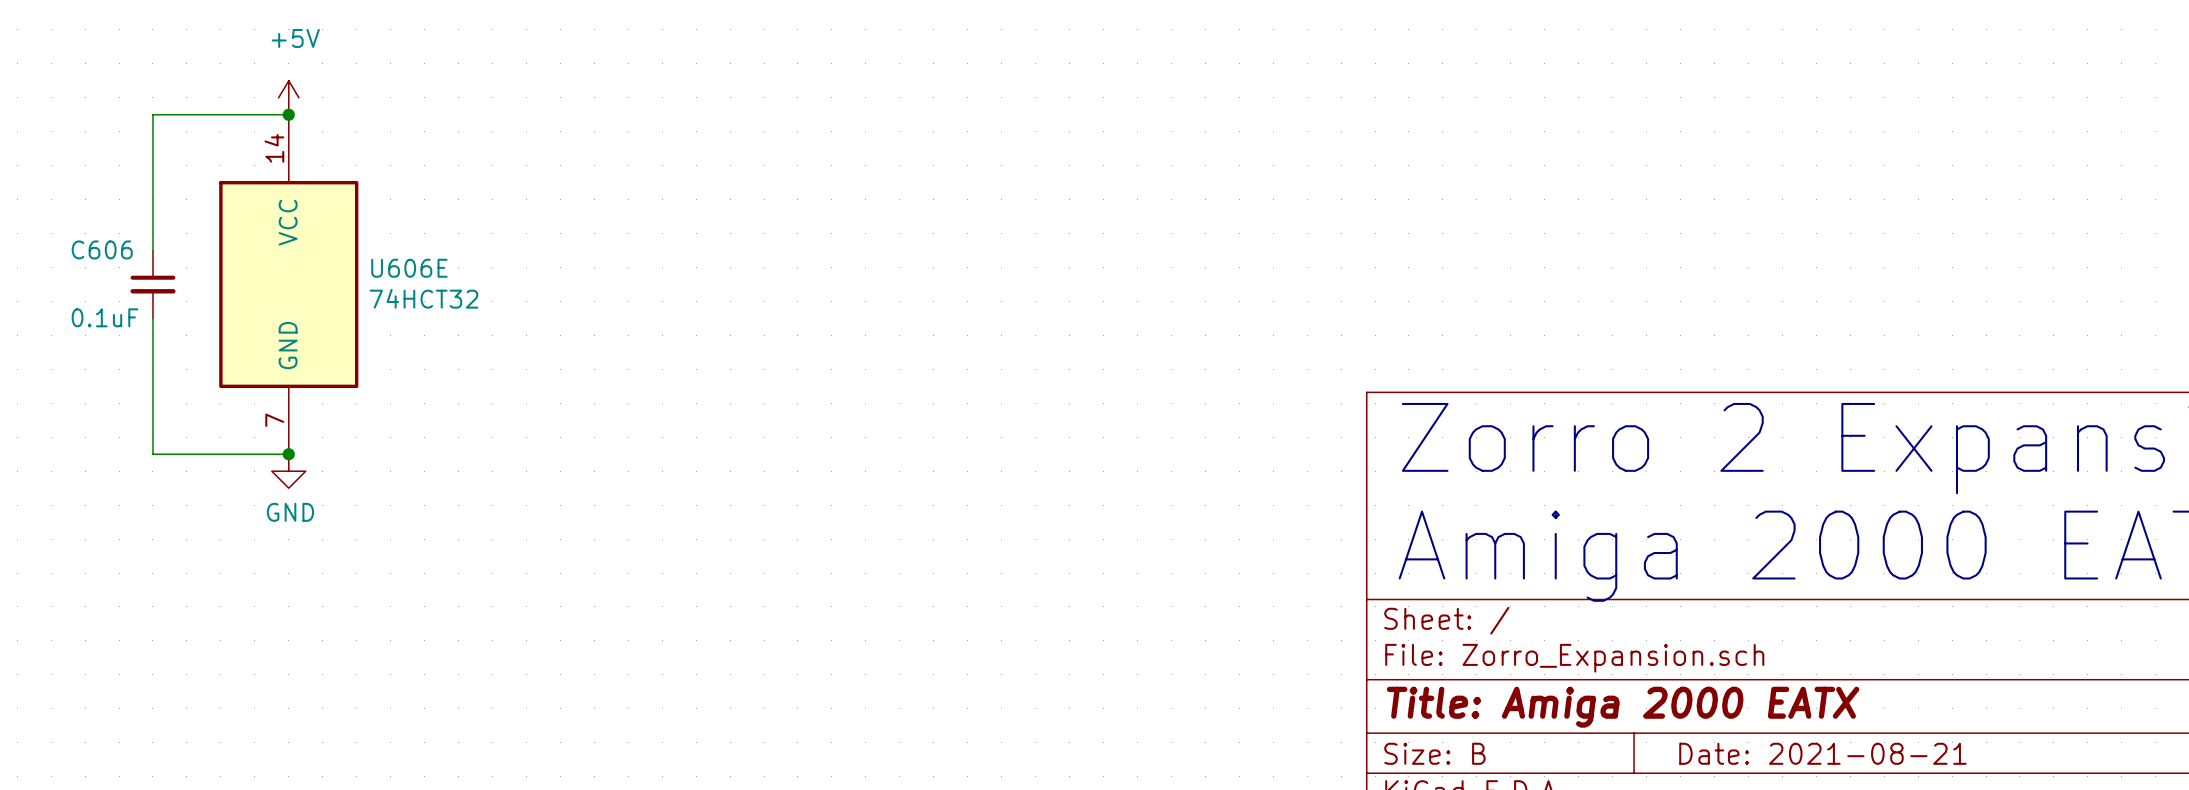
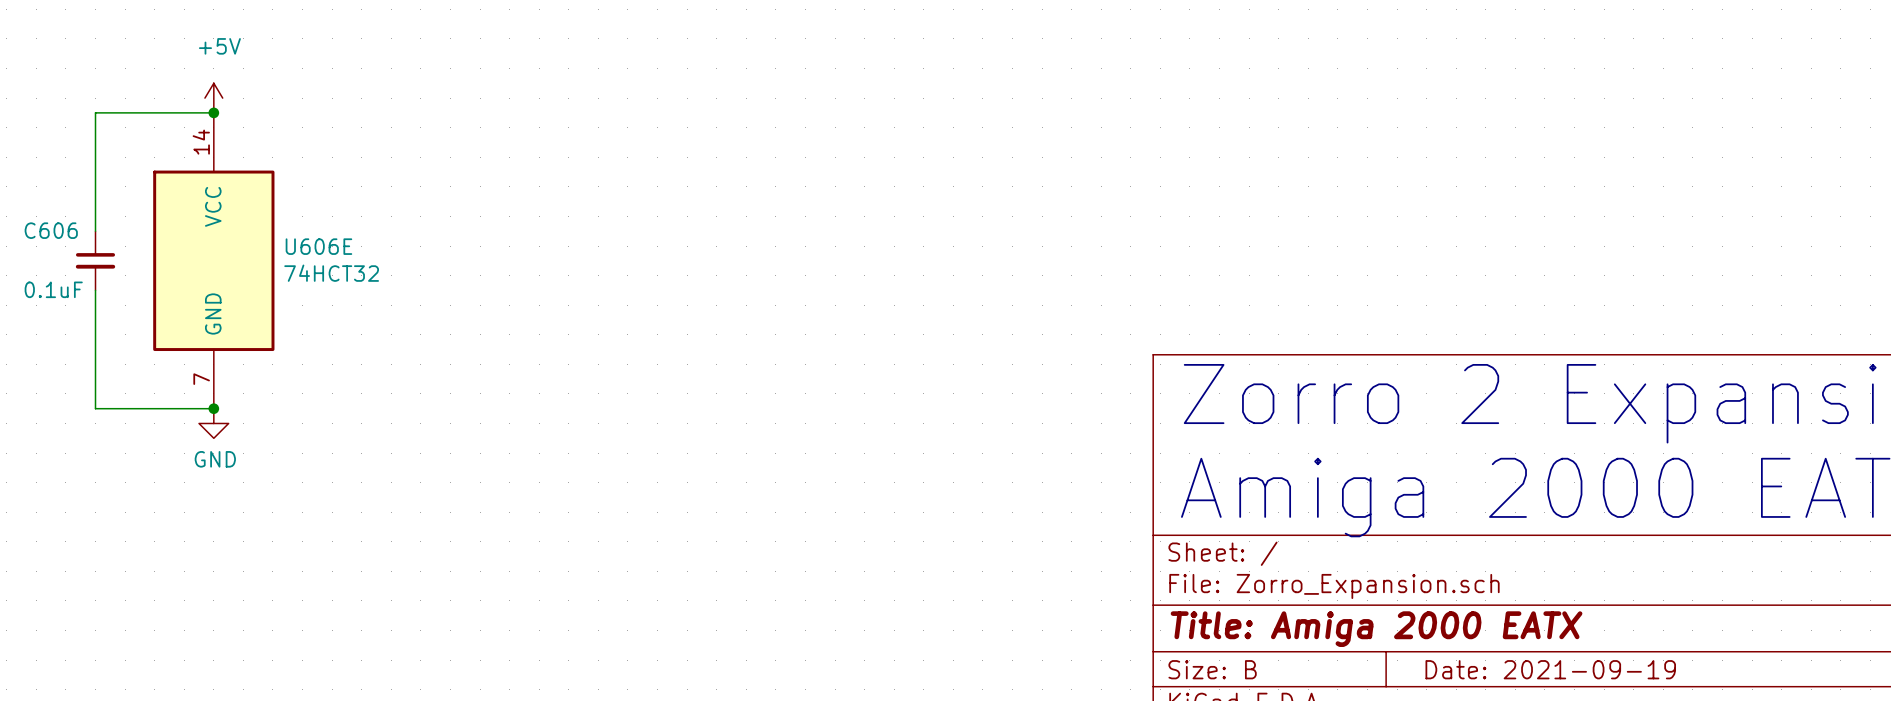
title block: Date: 2021-08-21 (1822, 753) -> Date: 2021-09-19 (1550, 669)

